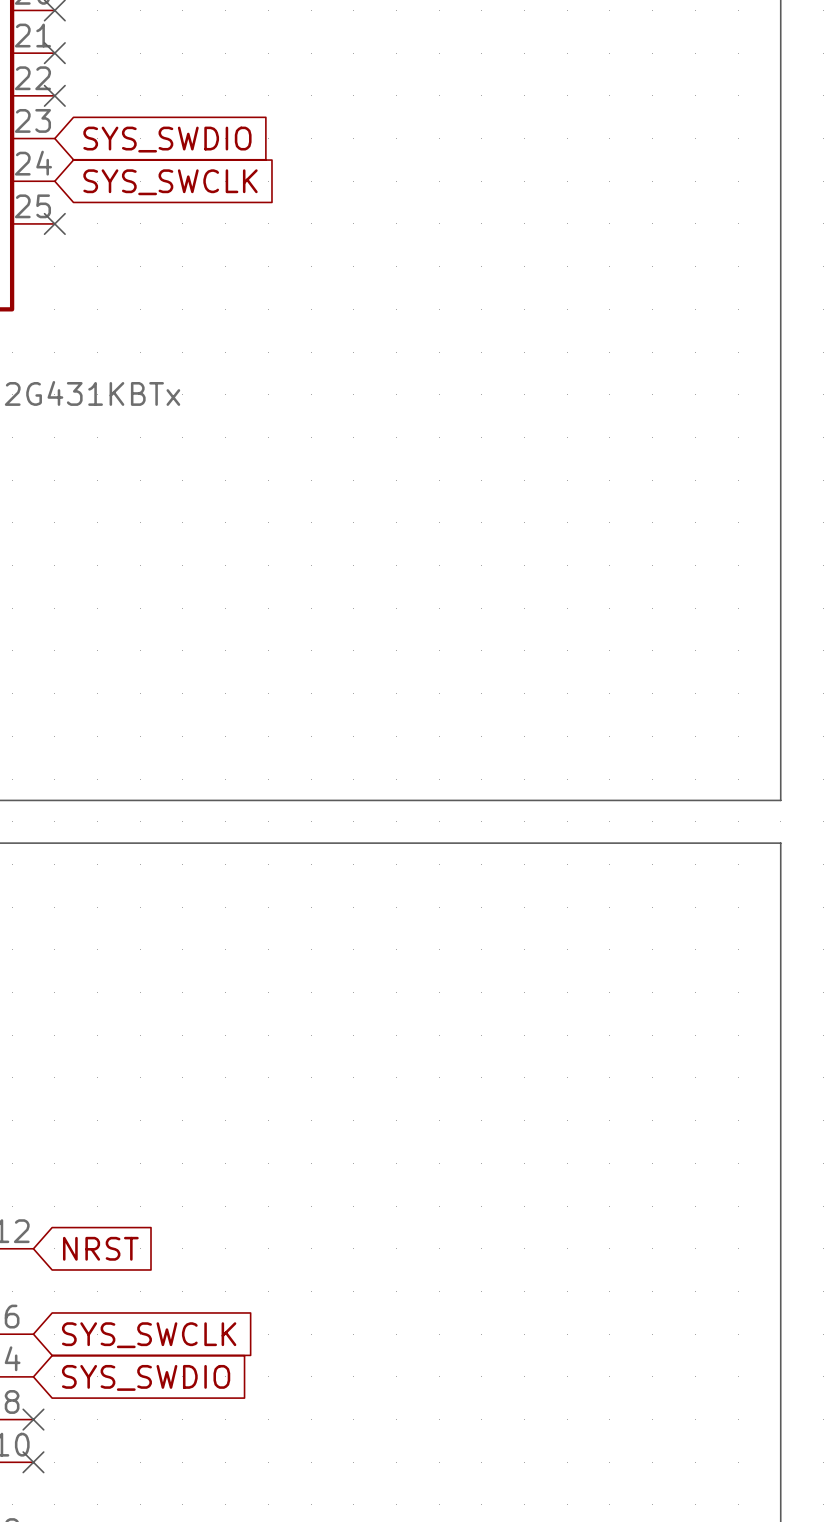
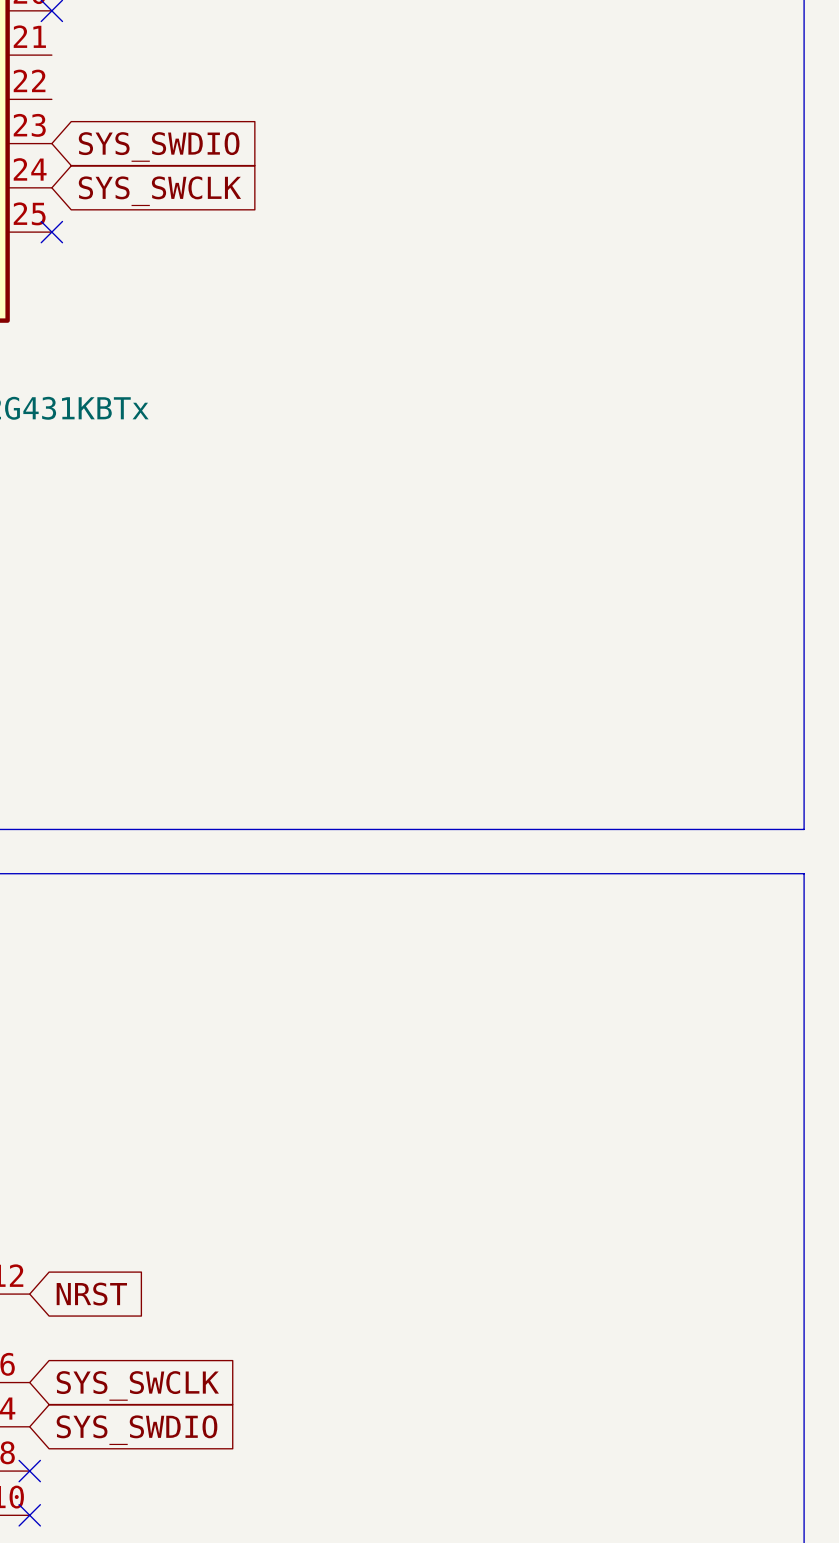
no-connect mark: (54, 53) -> none
no-connect mark: (54, 95) -> none

